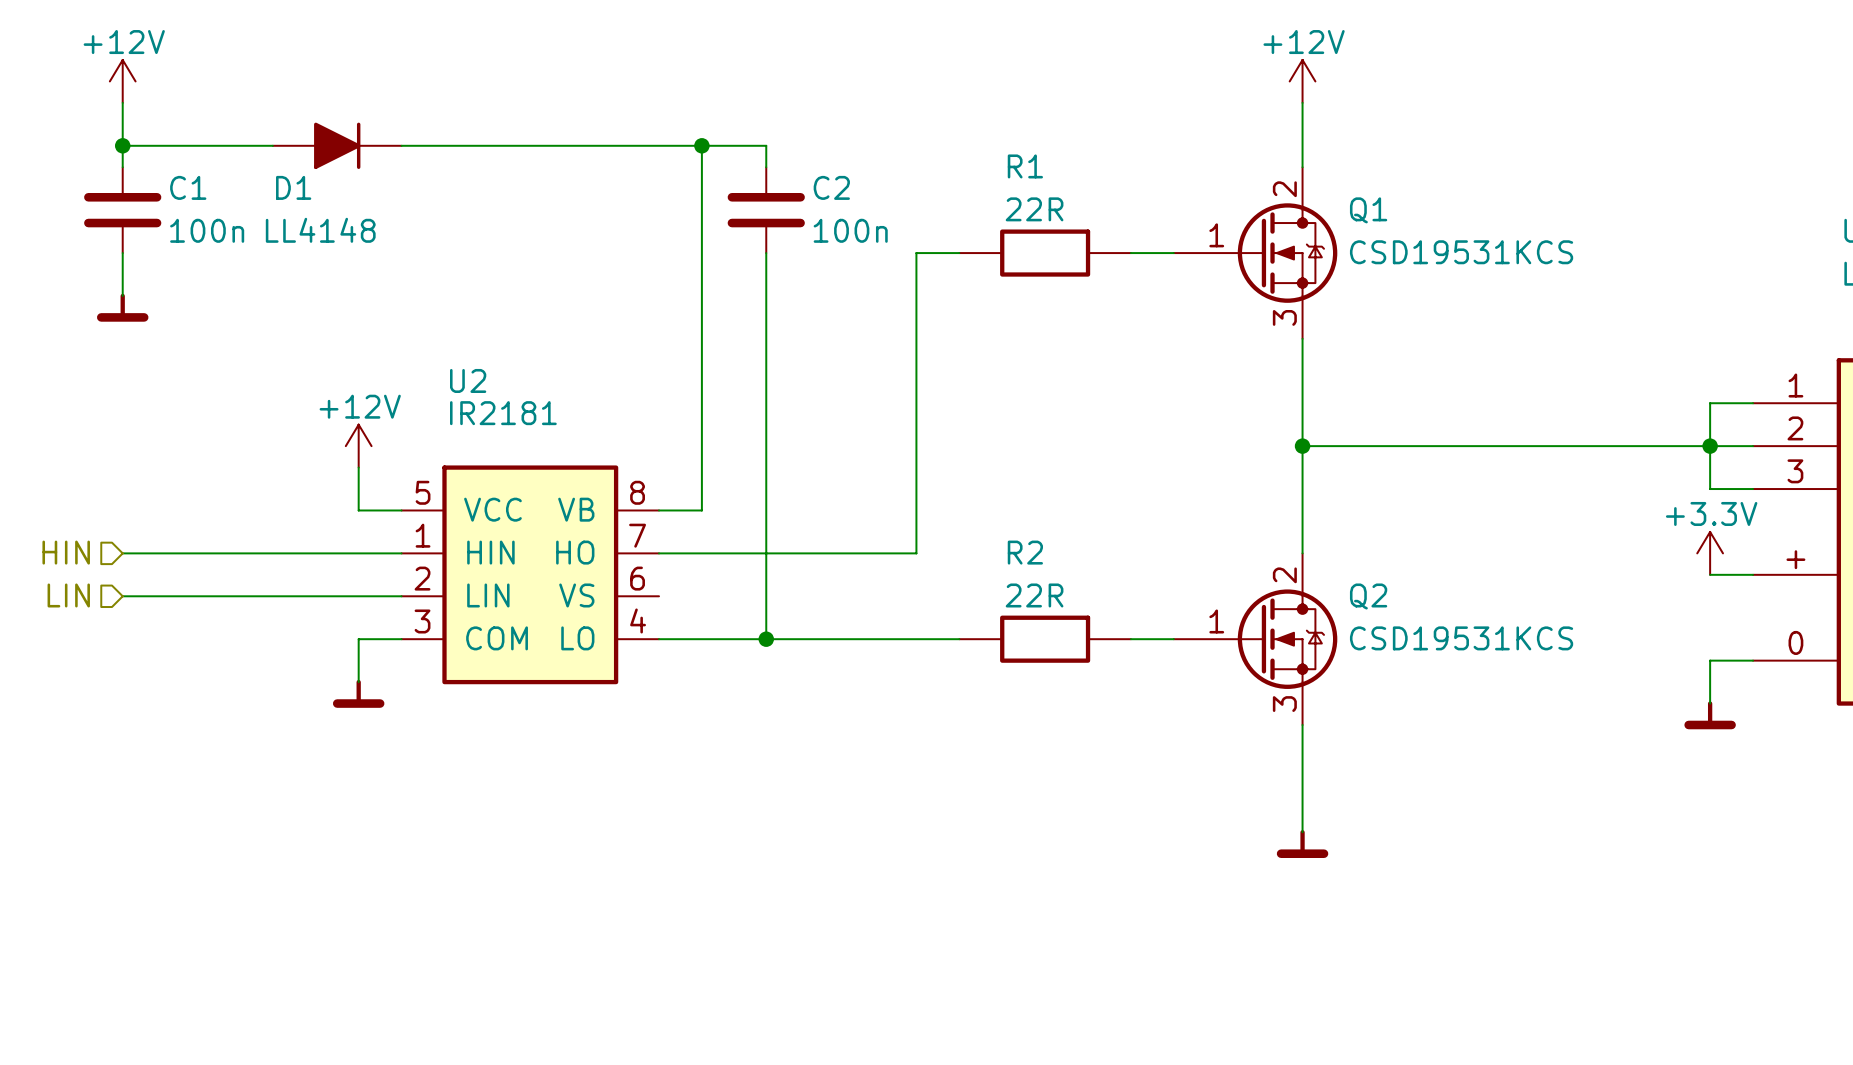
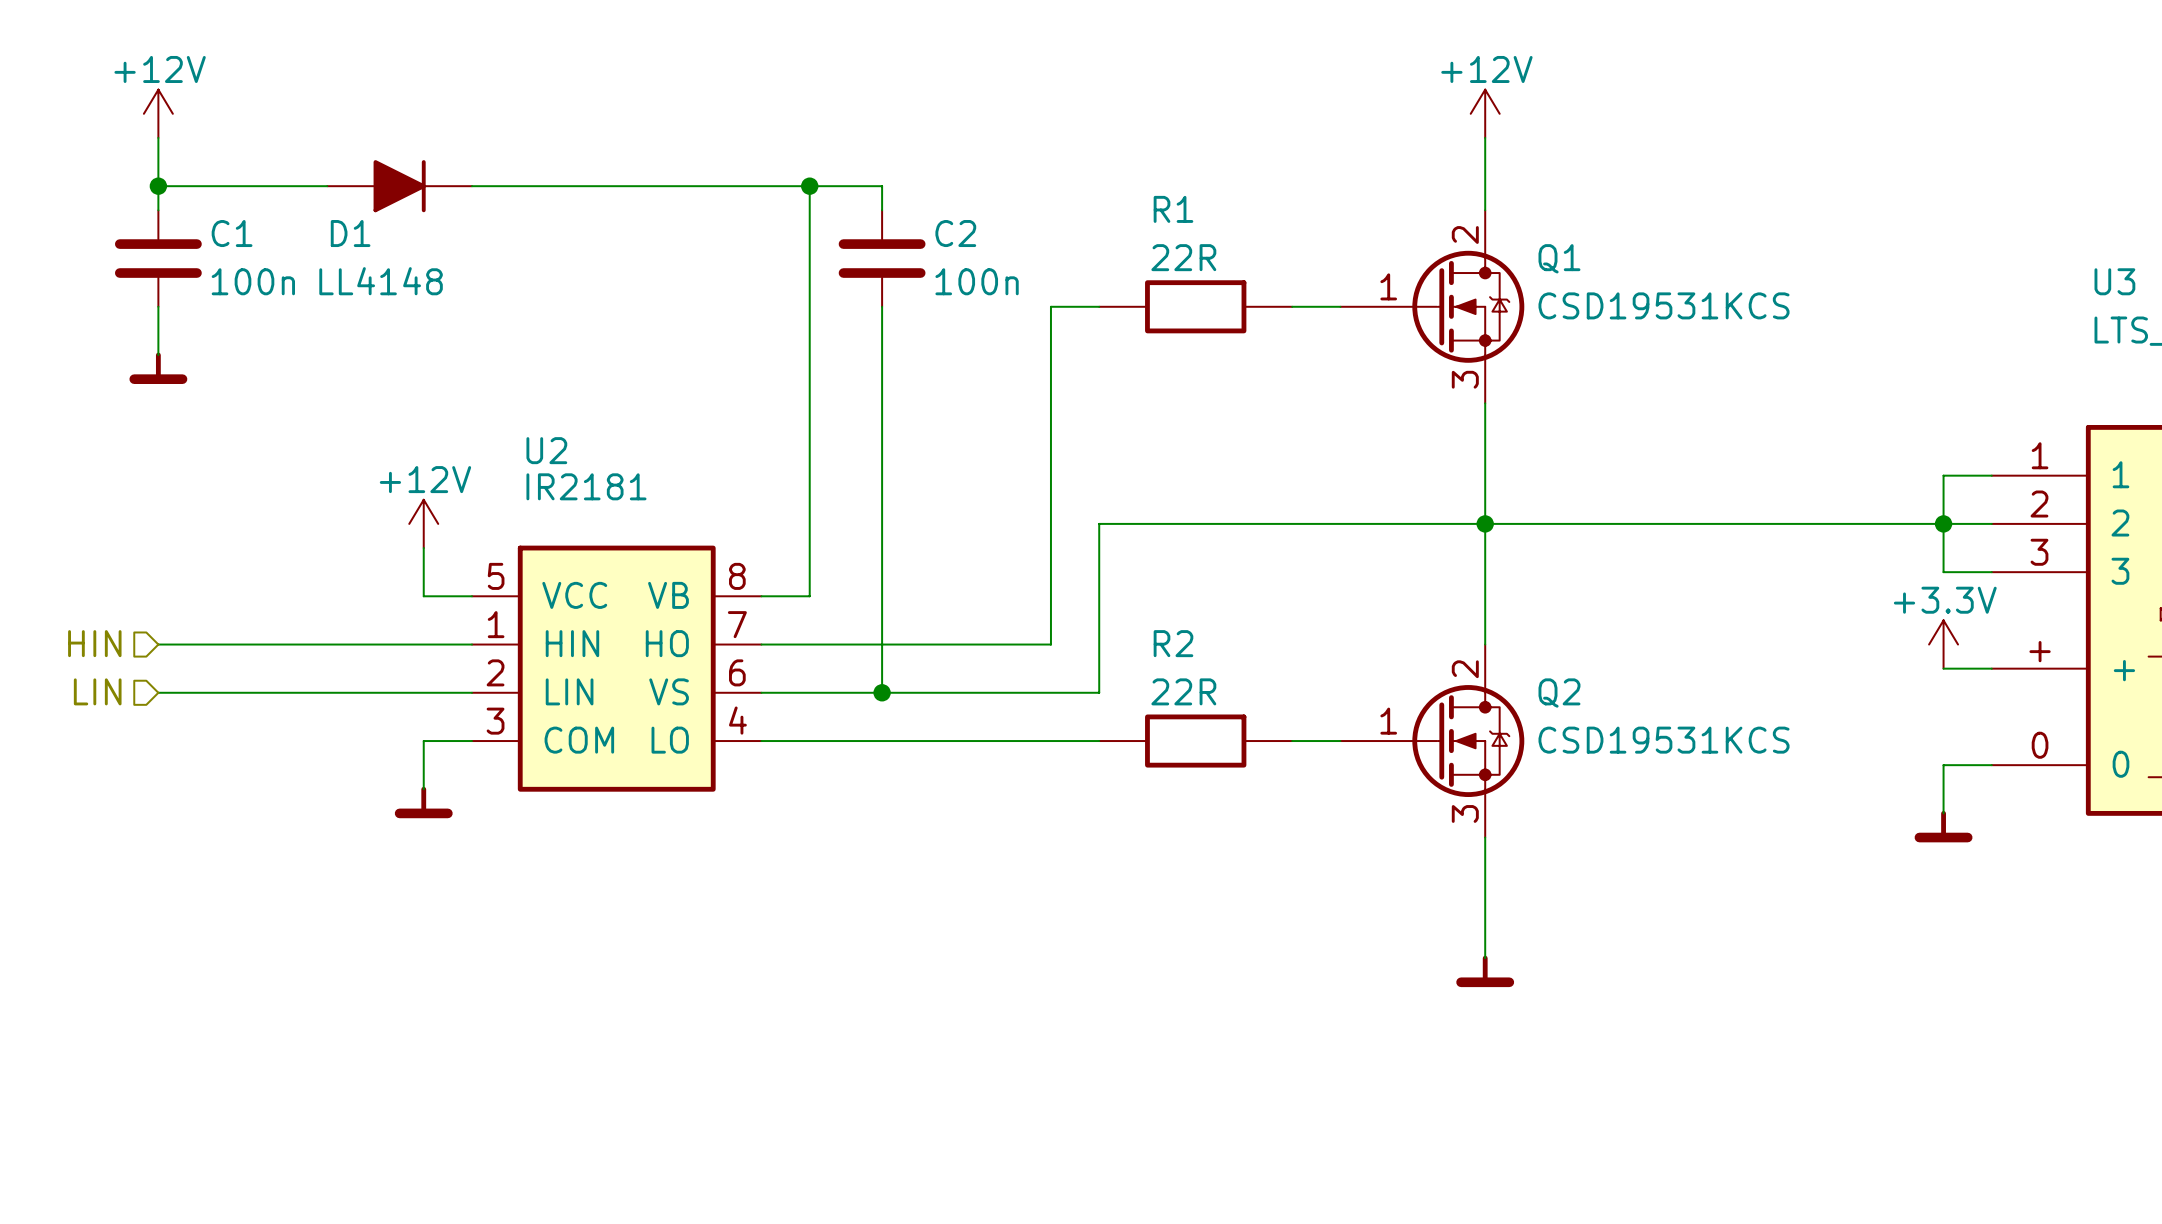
wire: none -> (1485, 523) (1099, 523) (1099, 692) (761, 692)
wire: (766, 596) (766, 639) -> none
junction position: (766, 639) -> (882, 692)

